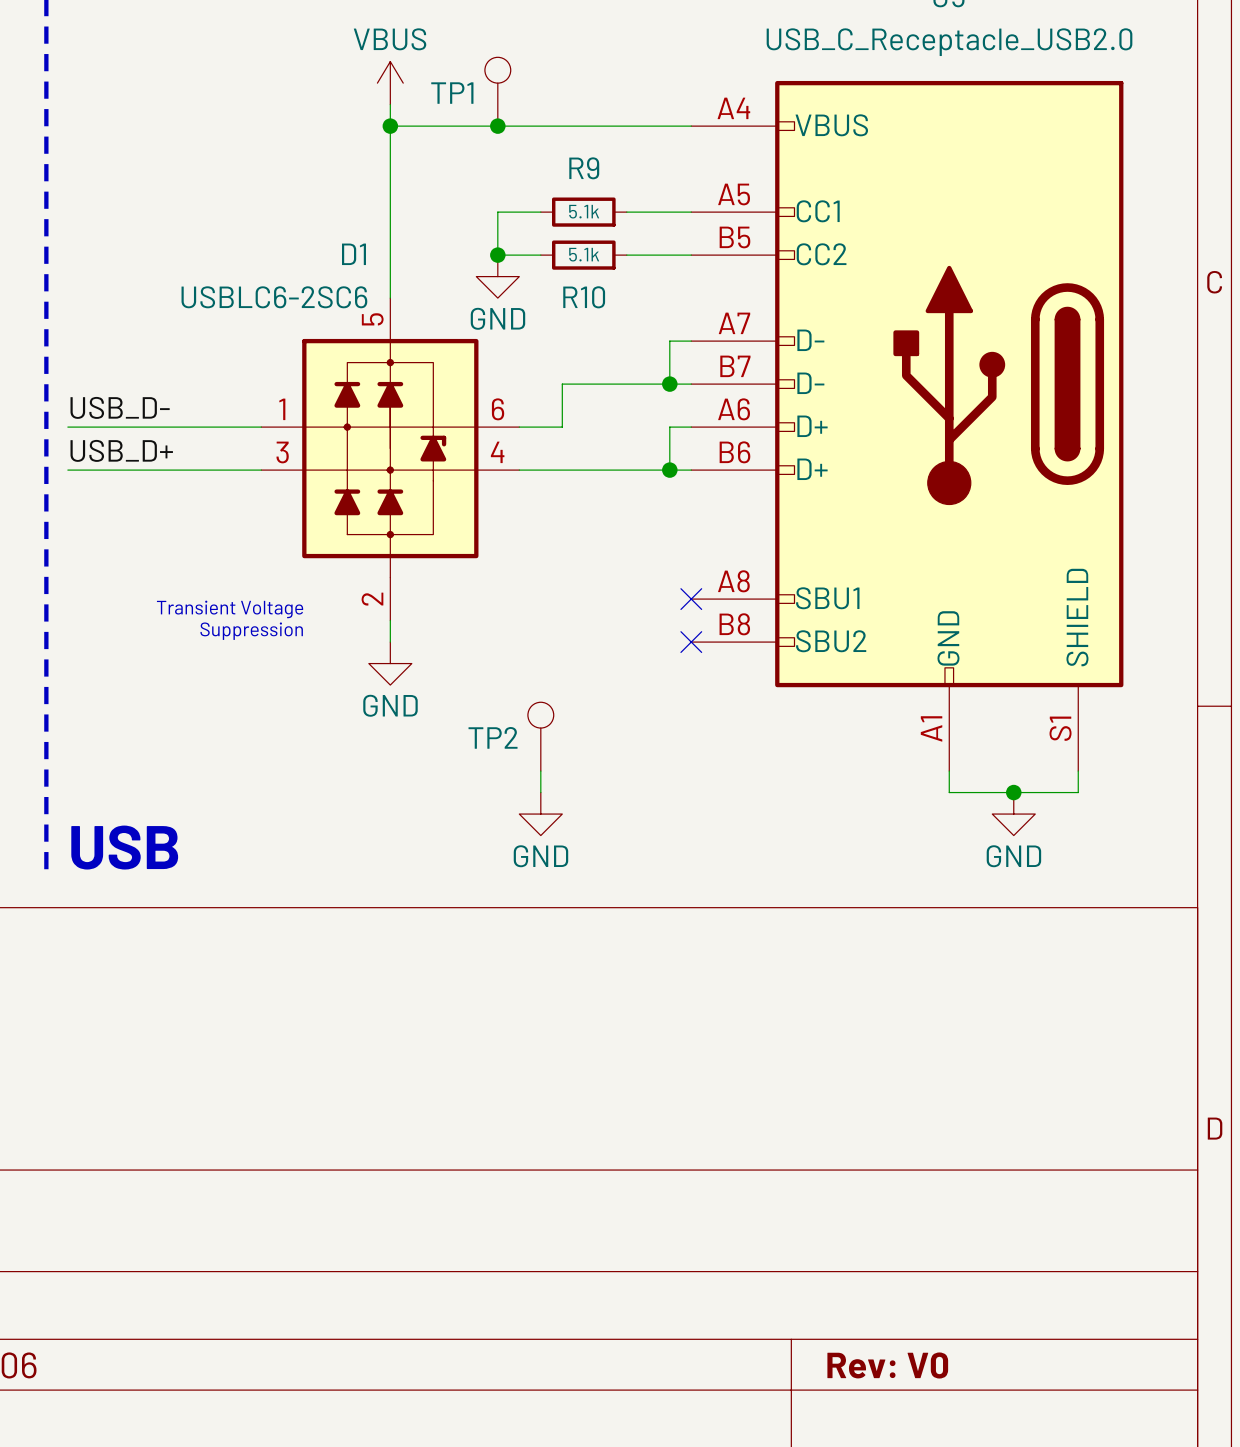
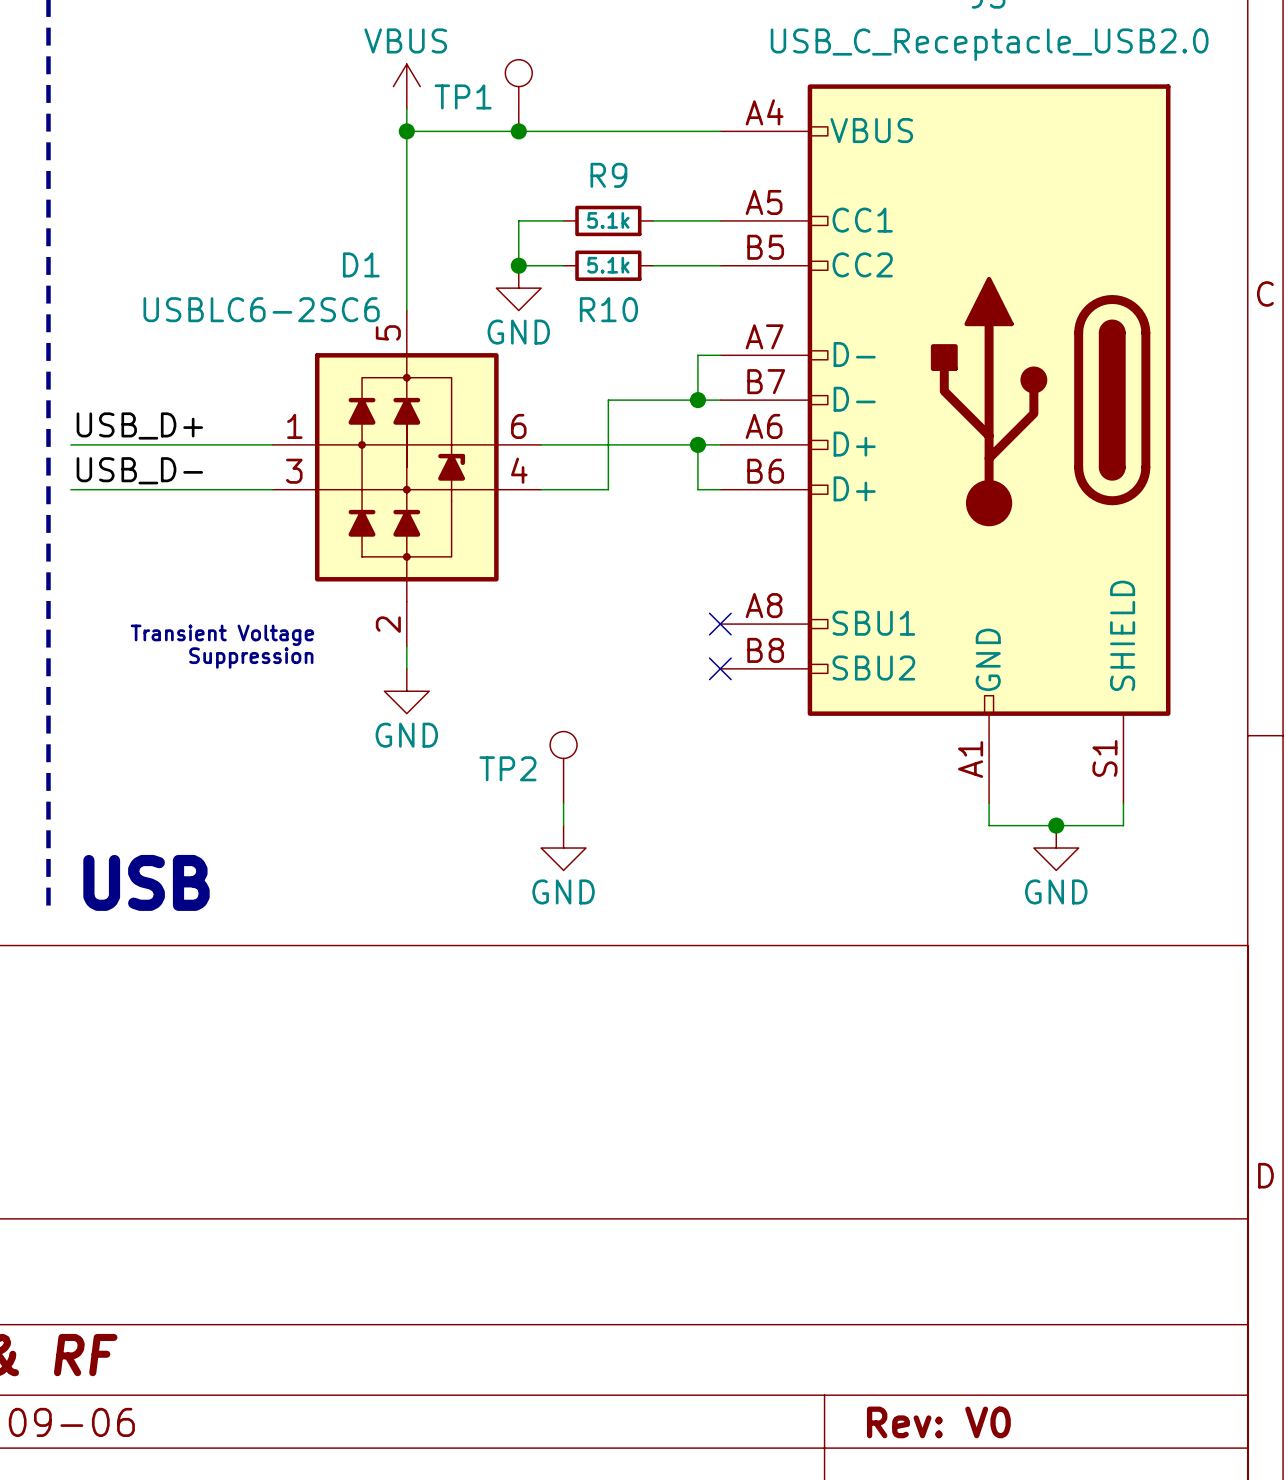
wire: (583, 384) (562, 384) (562, 427) -> (608, 400) (608, 489)
label: USB_D- (120, 407) -> USB_D+ (139, 425)
wire: none -> (585, 444) (697, 444)
label: USB_D+ (121, 450) -> USB_D- (139, 470)
wire: (583, 470) (669, 470) -> none
junction position: (669, 470) -> (697, 444)

